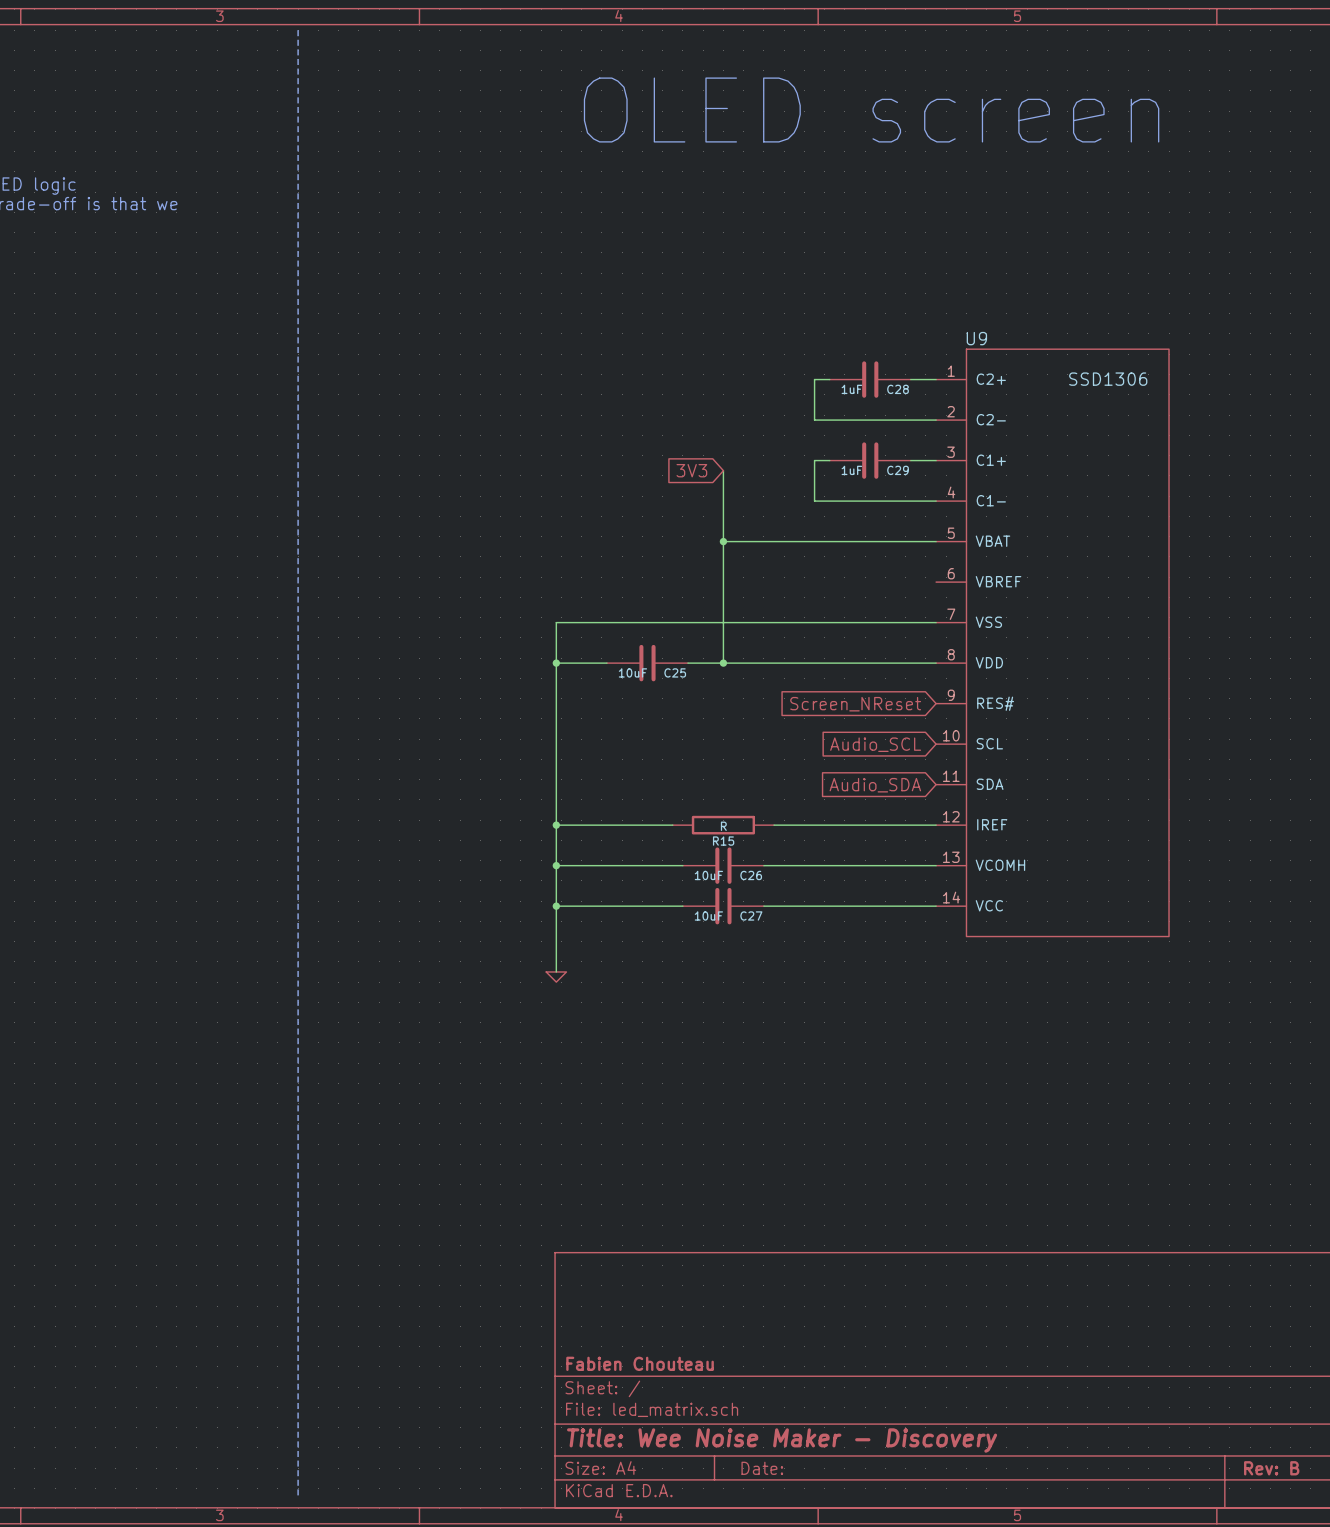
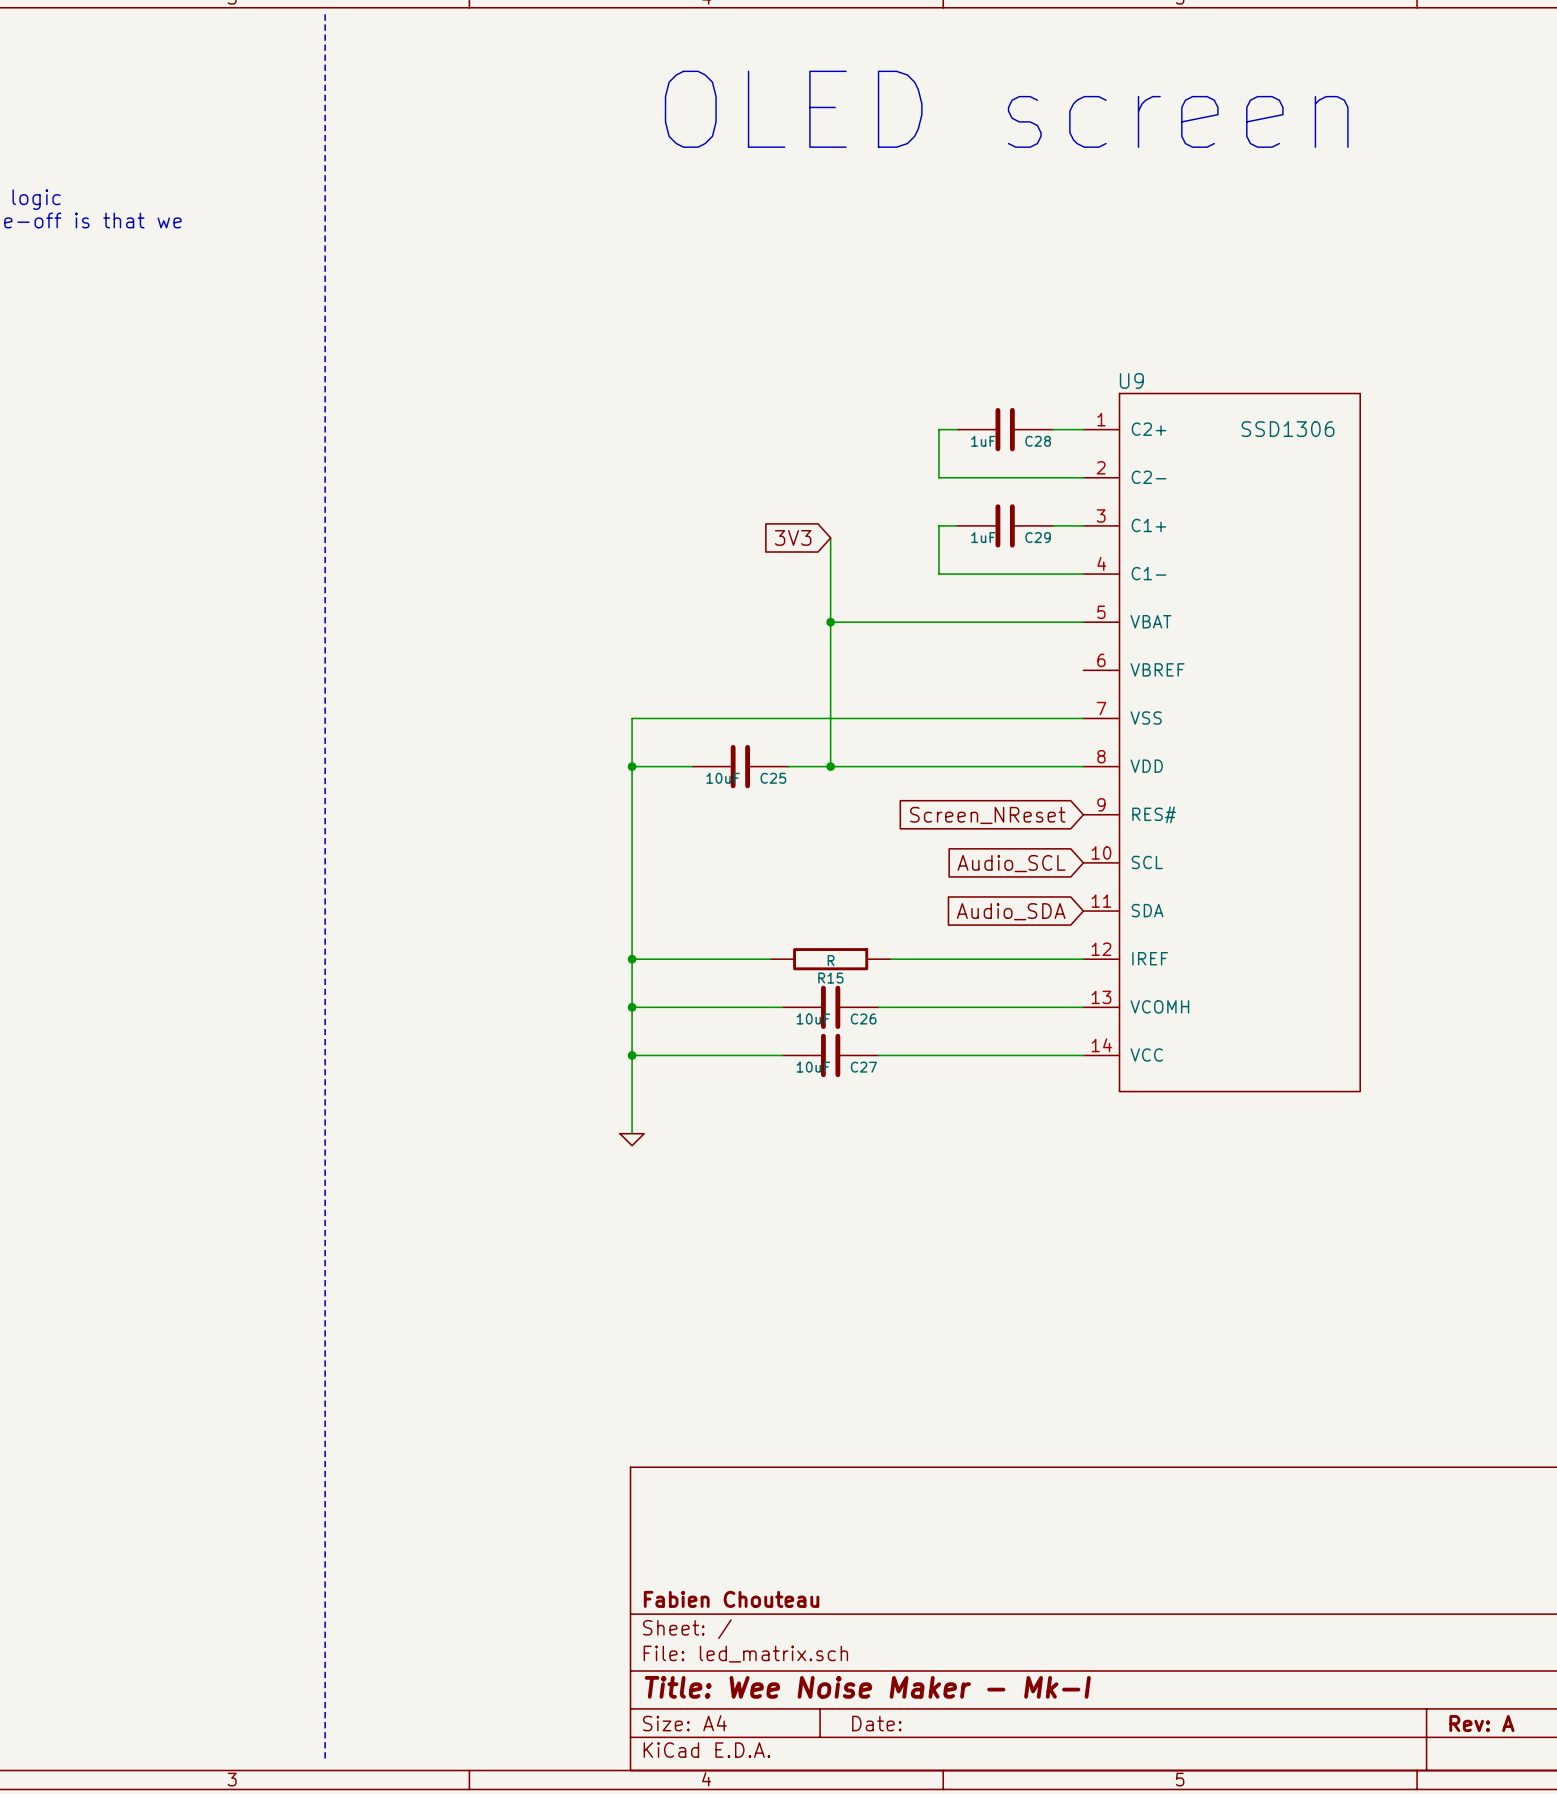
title block: Title: Wee Noise Maker - Discovery (782, 1440) -> Title: Wee Noise Maker - Mk-I (867, 1687)
title block: Rev: B (1271, 1468) -> Rev: A (1481, 1723)

